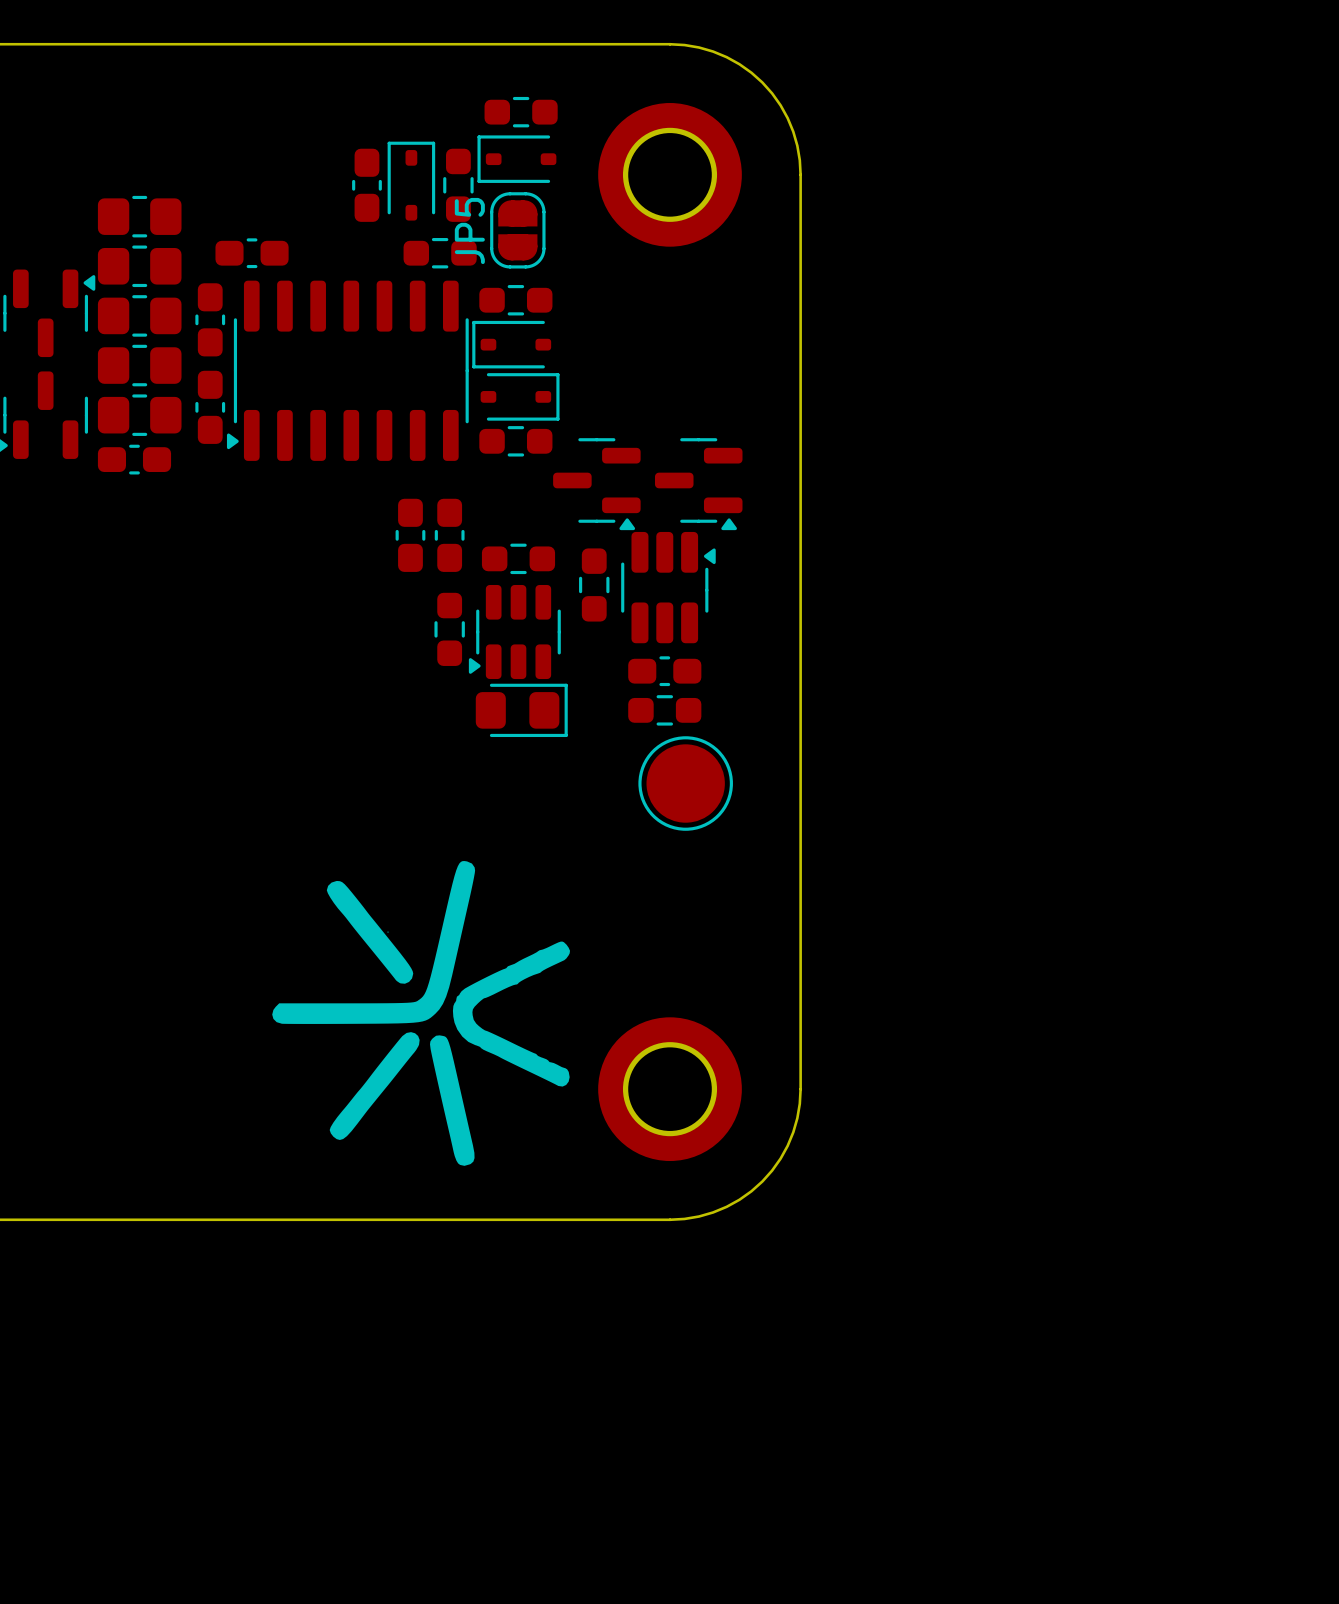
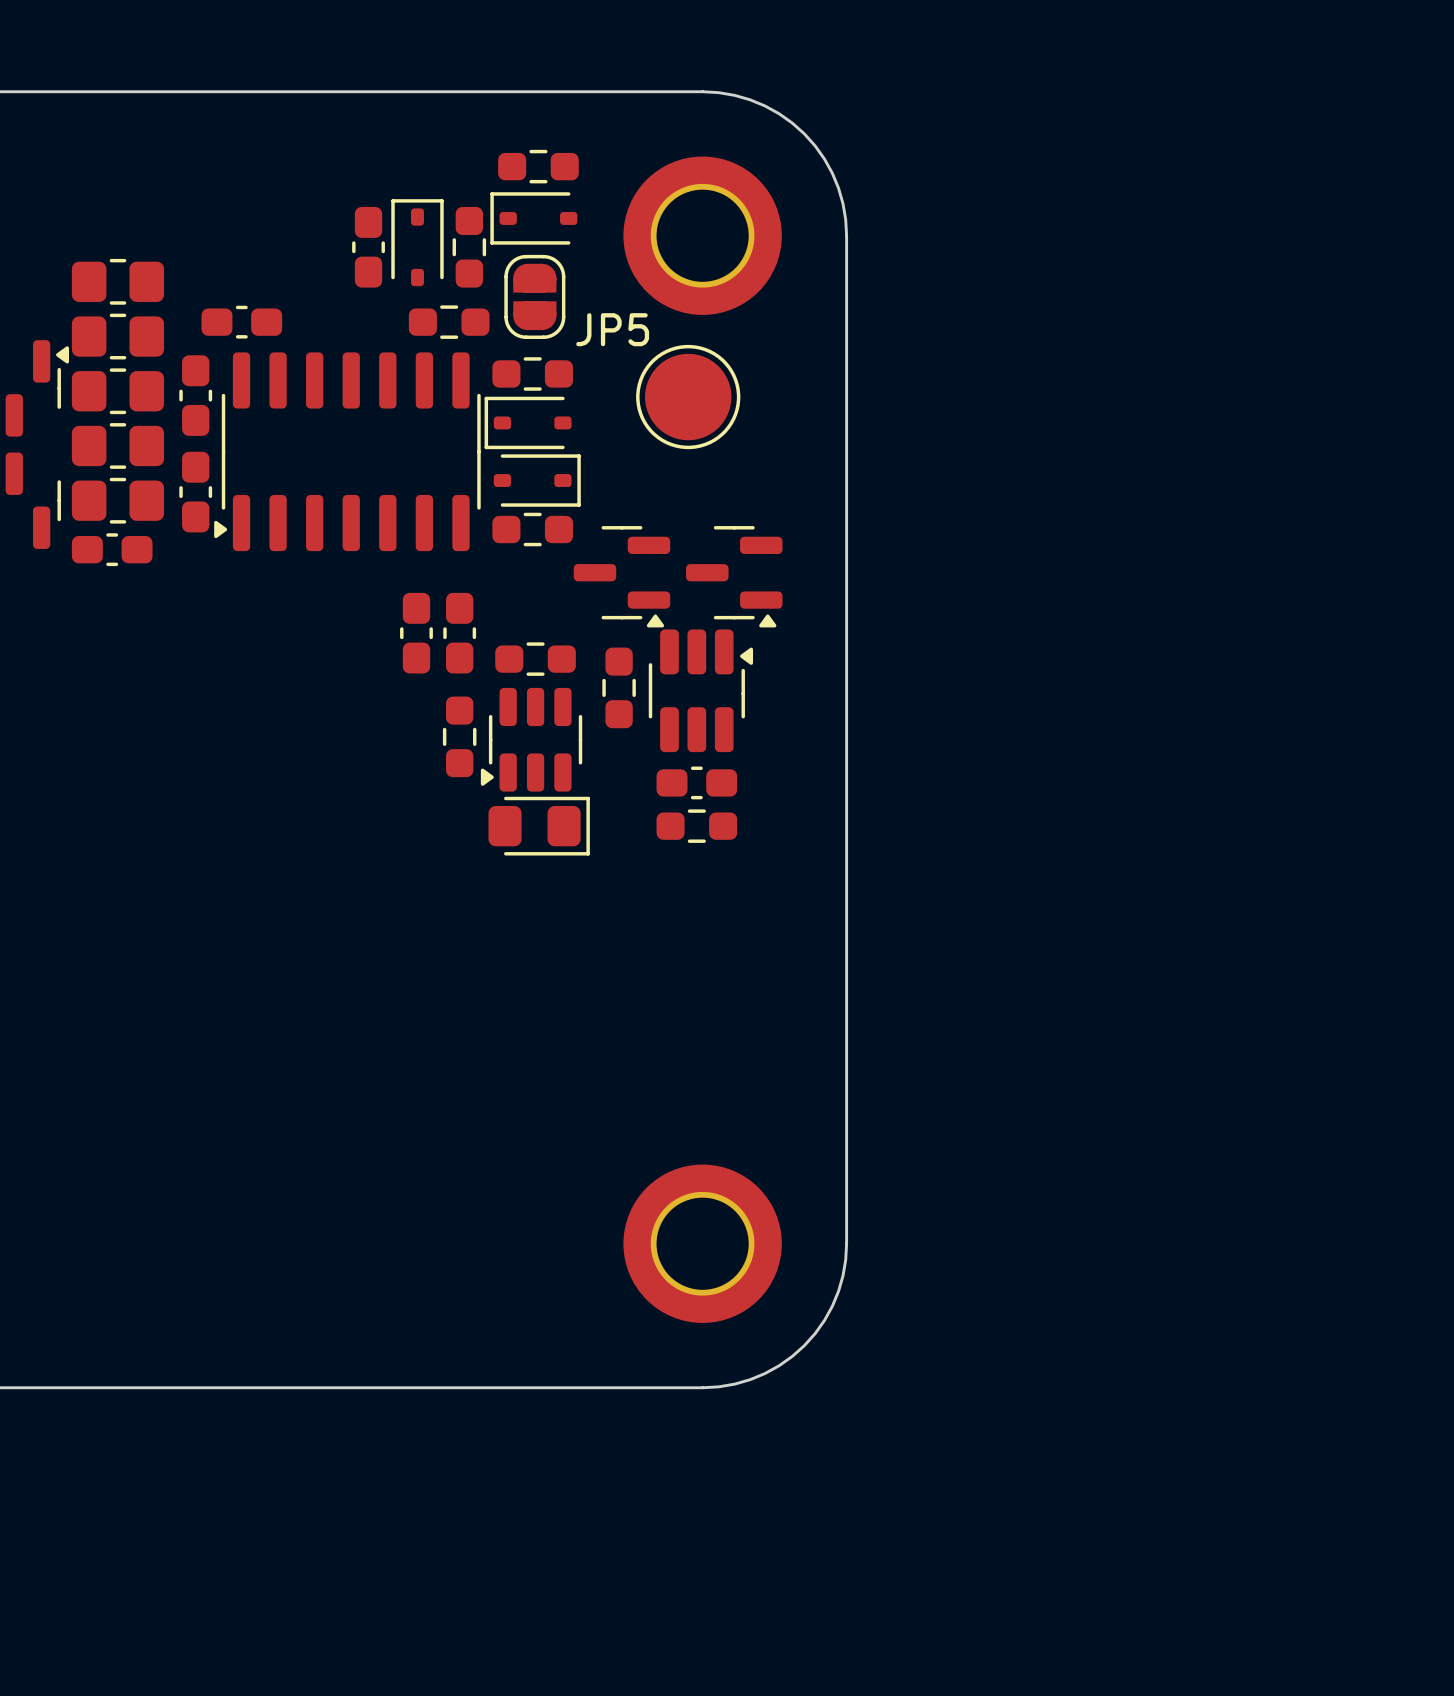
JP5 name rotation: 0° (469, 230) -> 90° clockwise (612, 329)
JP5 name position: JP5 (469, 230) -> JP5 (612, 329)
part position: (685, 783) -> (688, 397)
drawing: [272, 861, 571, 1166] -> none

